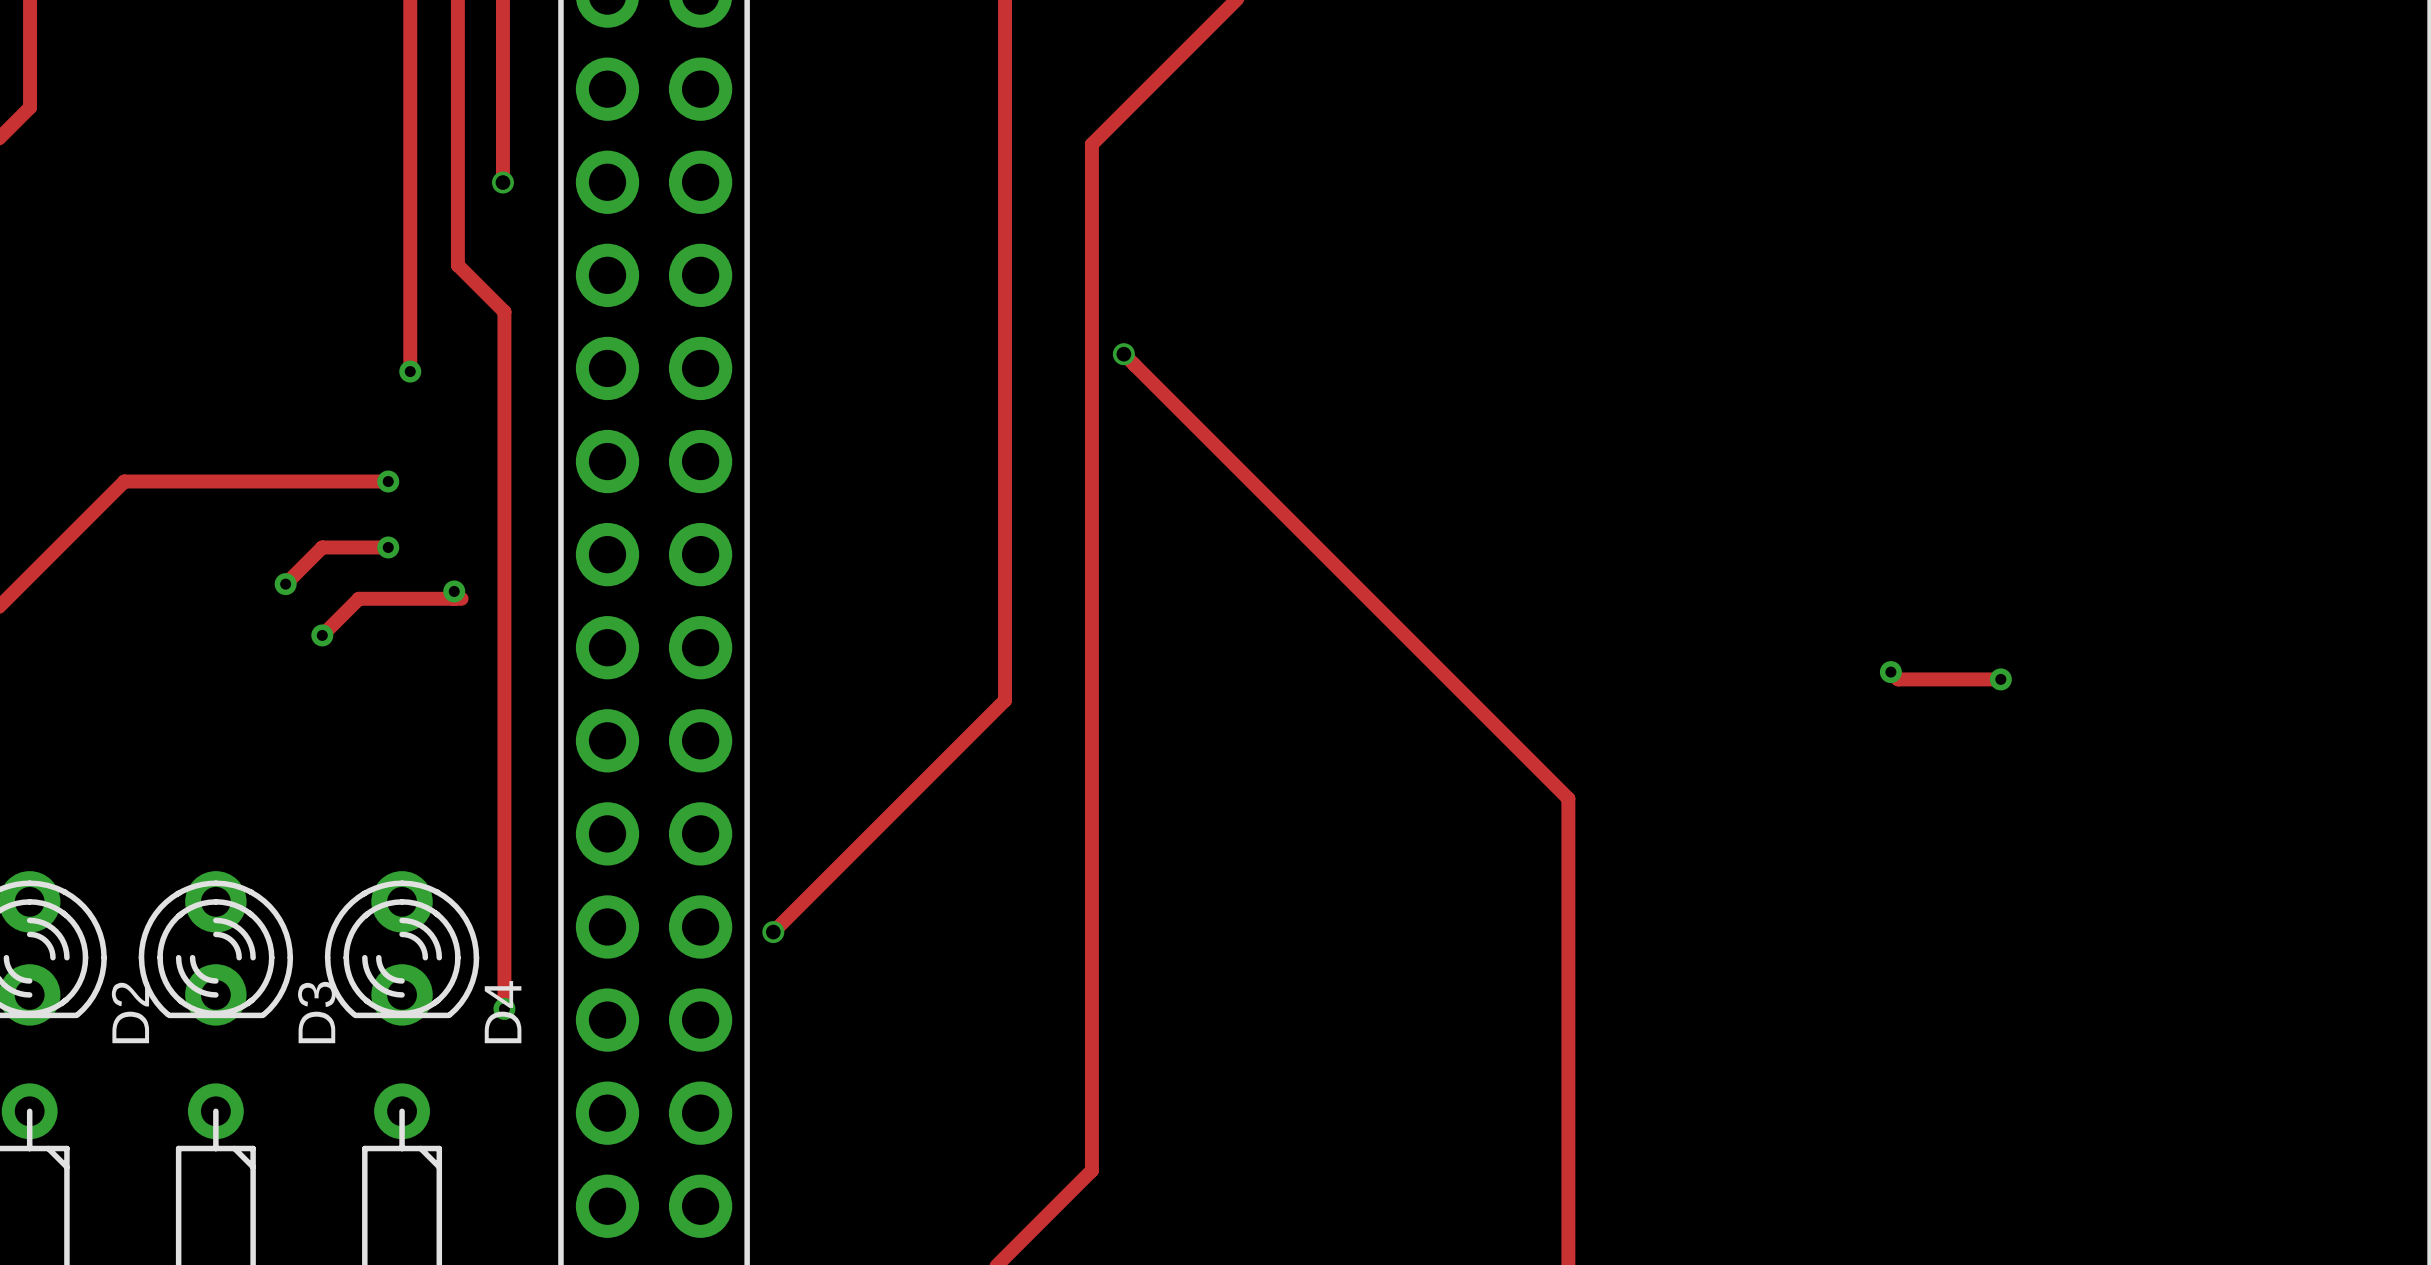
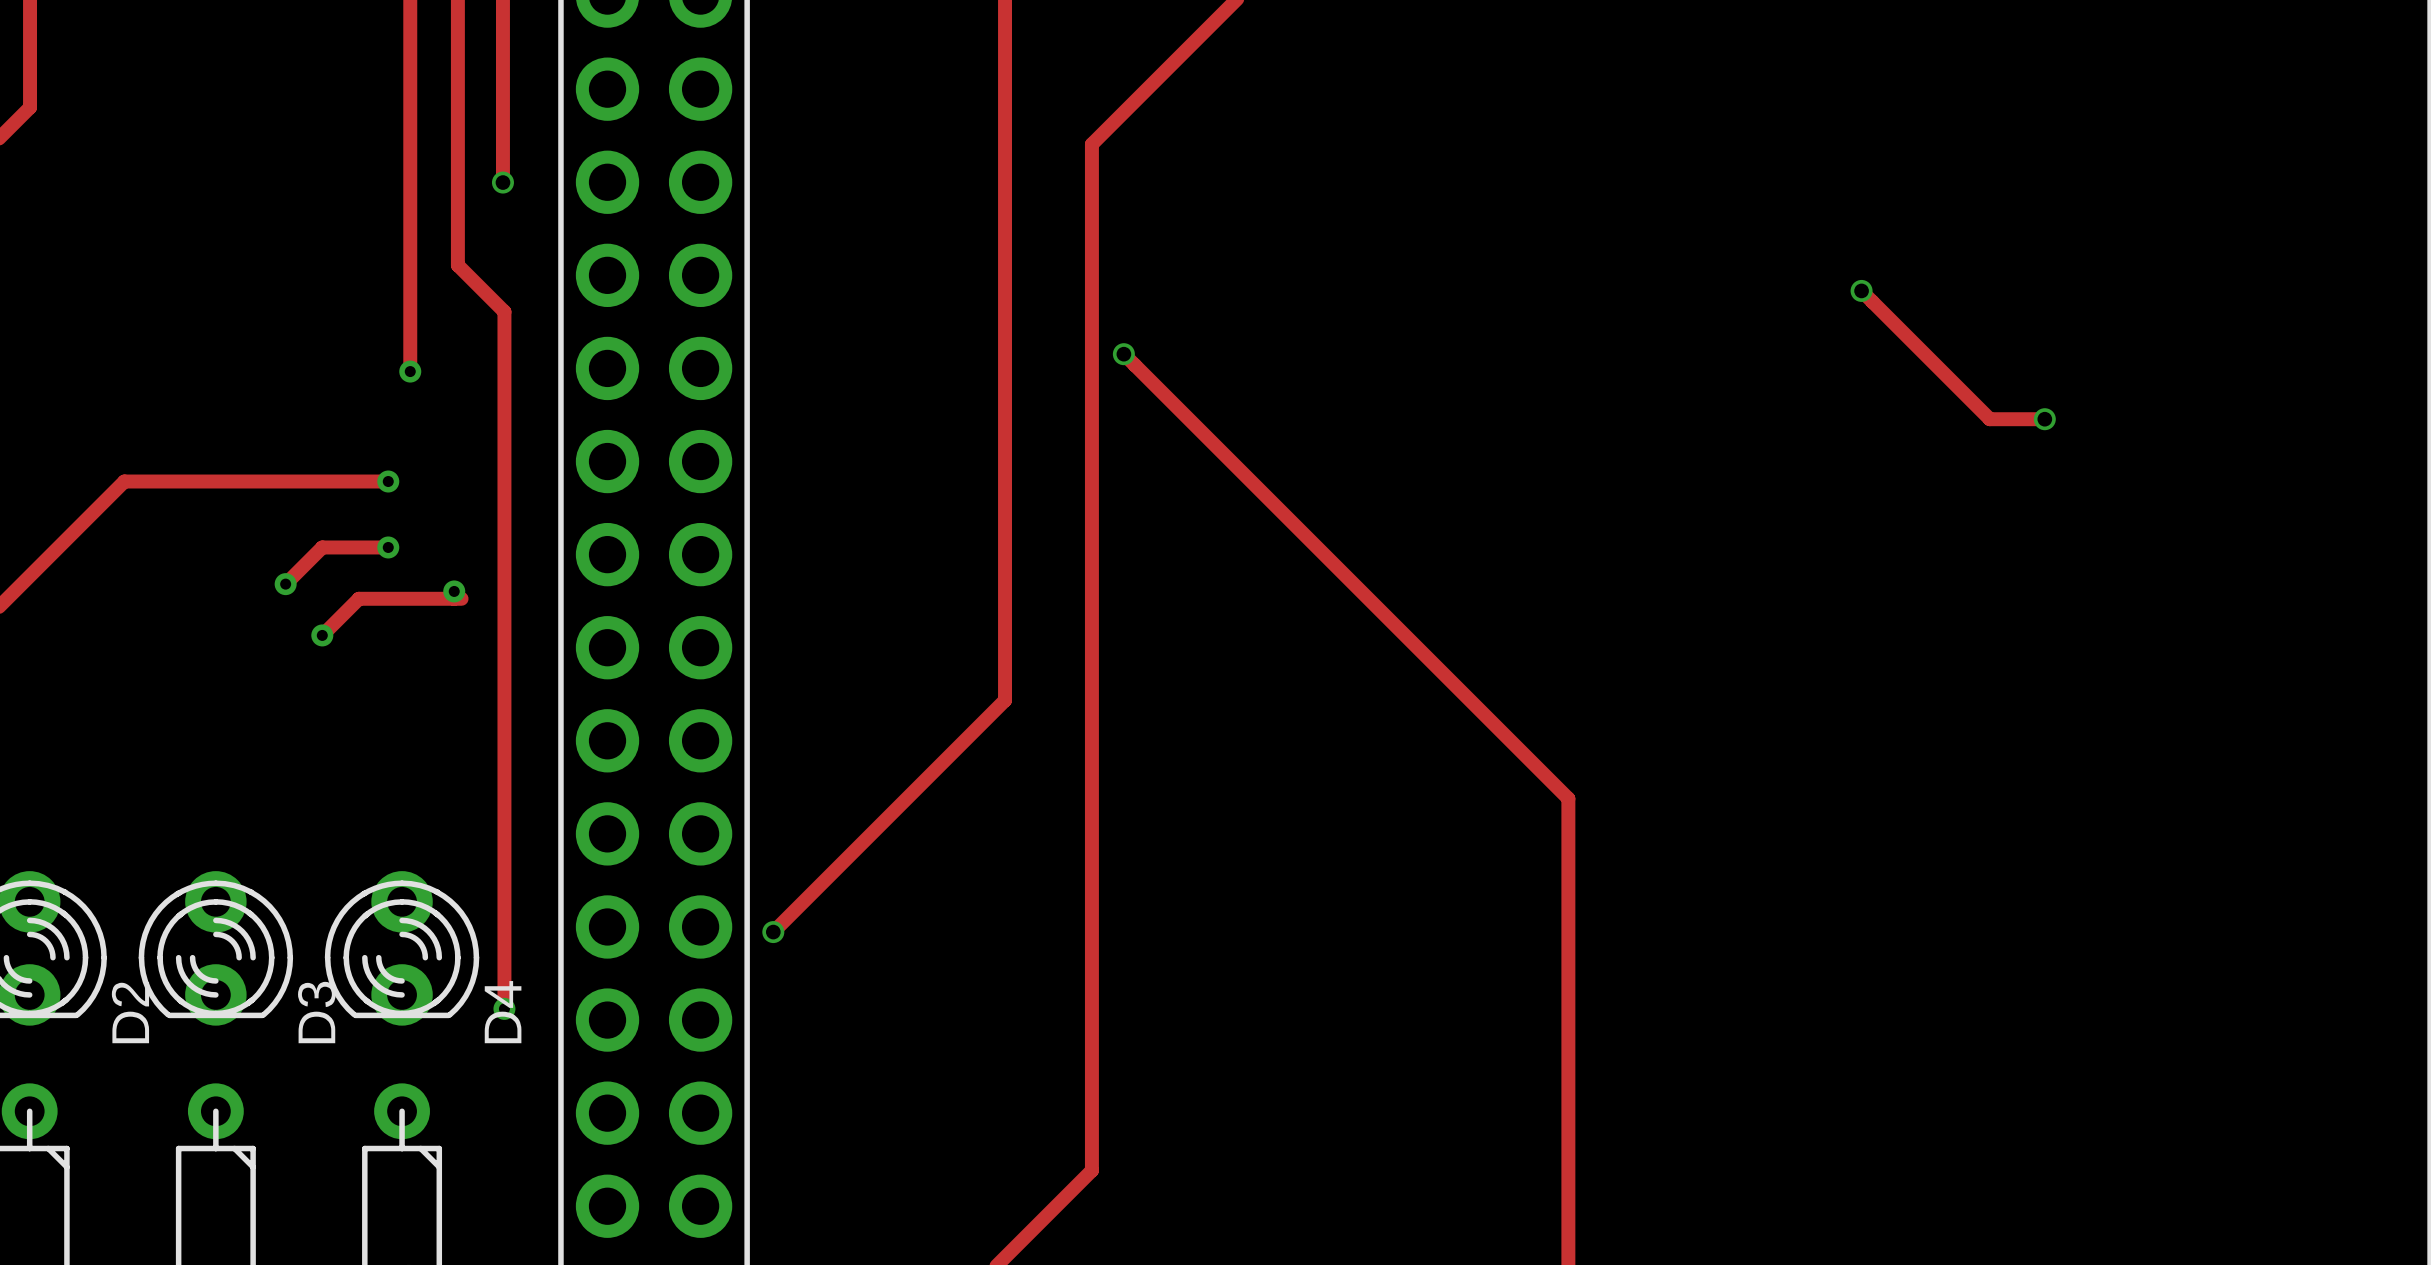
track: none -> (1861, 290) (1989, 419) (2044, 419)
via: none -> (1861, 290)
via: none -> (2044, 419)
track: (1890, 672) (1898, 679) (2000, 679) -> none
via: (1890, 672) -> none
via: (2000, 679) -> none

